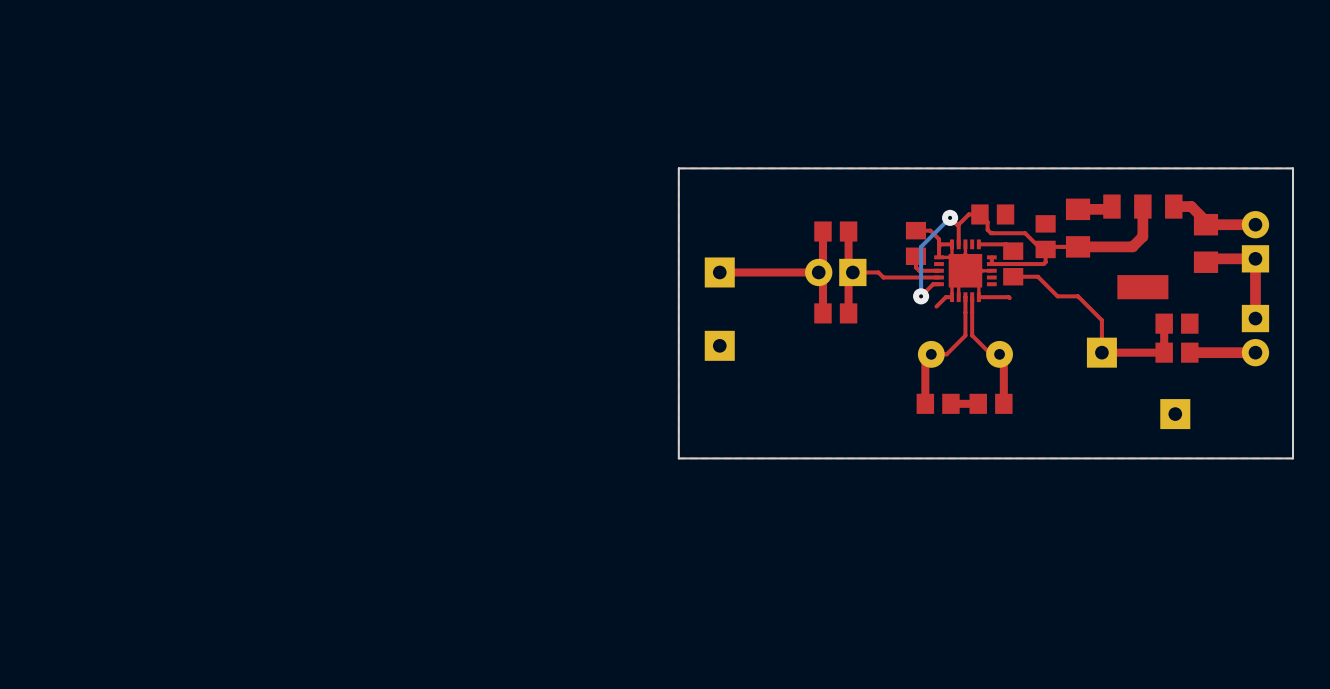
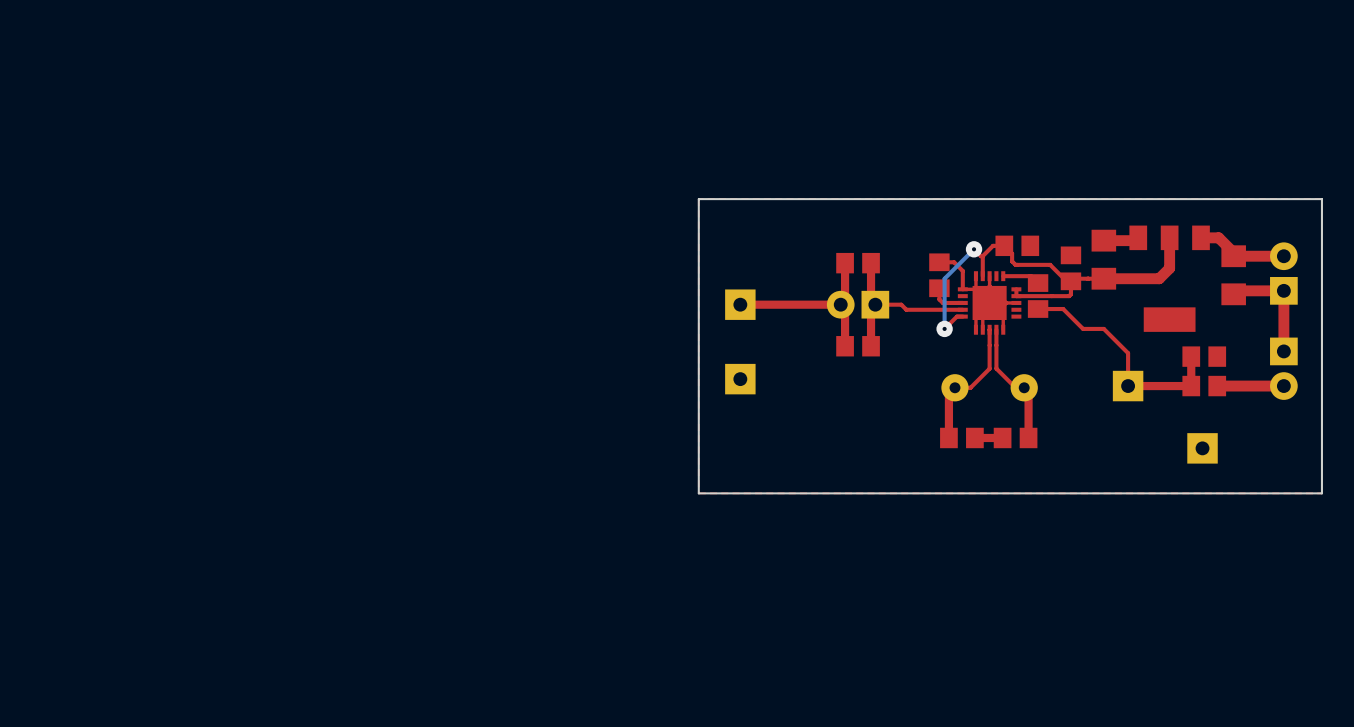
top track: (951, 244) (939, 245) -> none
top track: (951, 297) (945, 297) (936, 306) -> none
top track: (978, 297) (1009, 298) -> none

